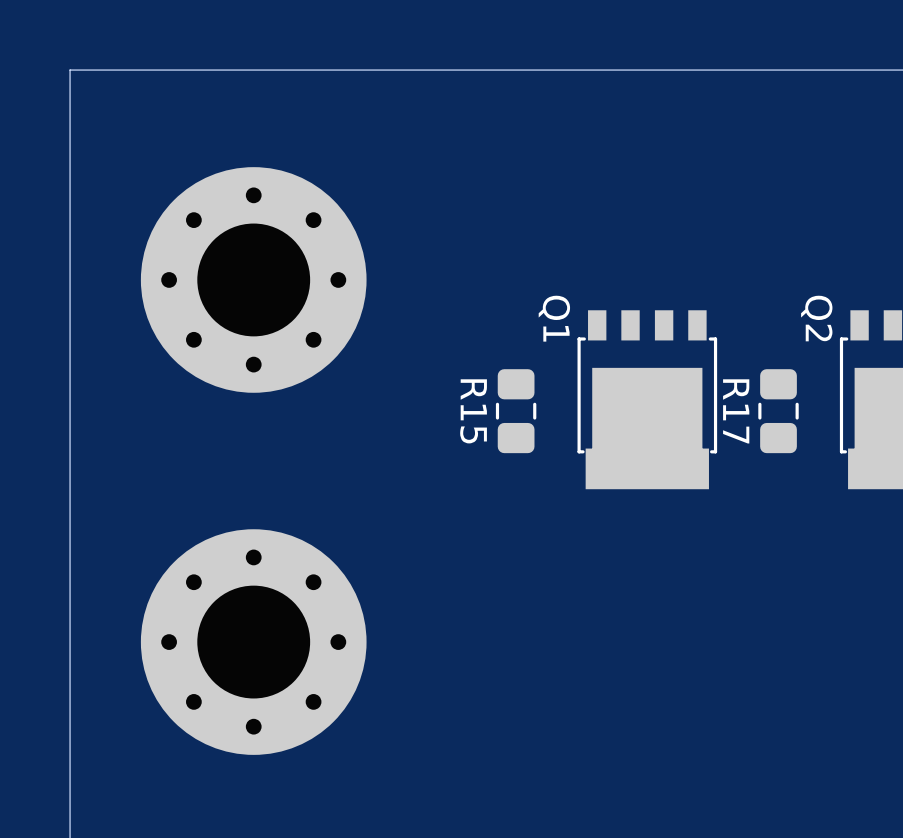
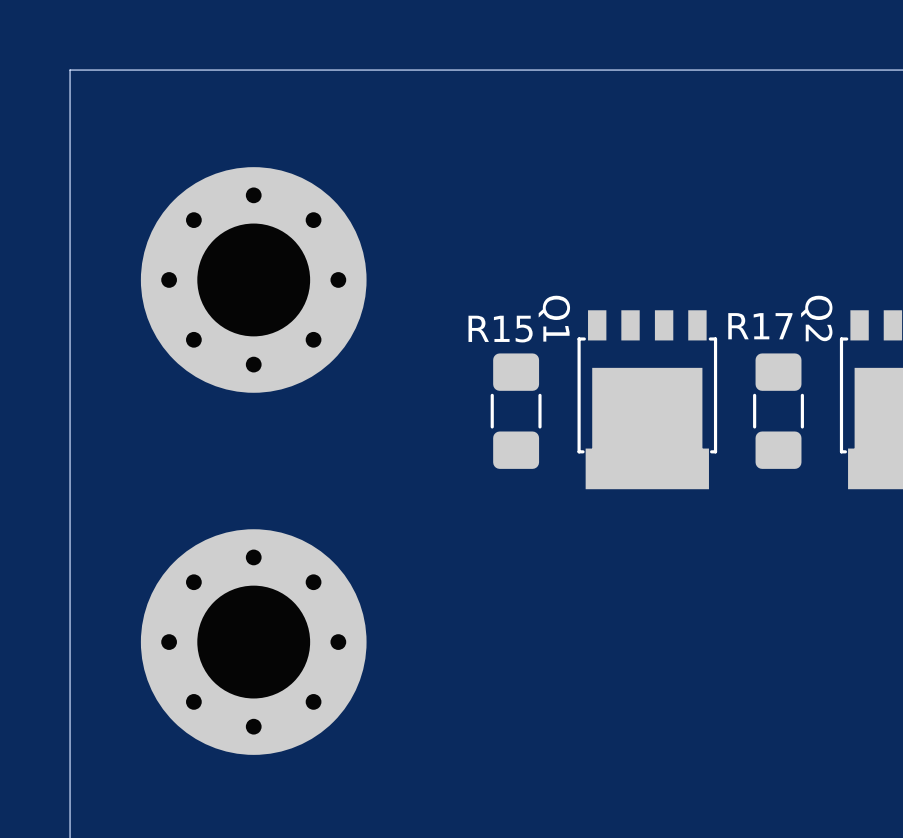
R15 footprint: [495, 369, 537, 454] -> [490, 353, 542, 469]
R17 footprint: [758, 369, 799, 454] -> [753, 353, 804, 469]
R15 name rotation: 0° (473, 411) -> 90° counterclockwise (500, 329)
R17 name rotation: 0° (736, 411) -> 90° counterclockwise (760, 326)

